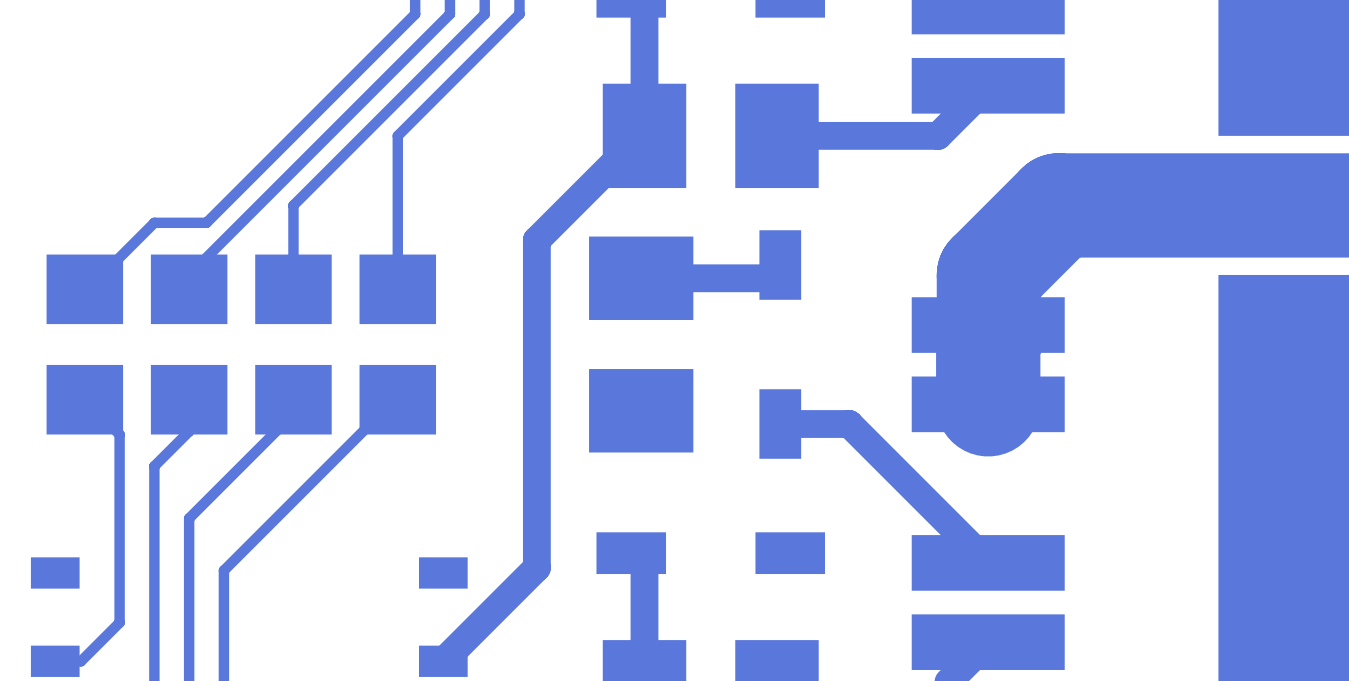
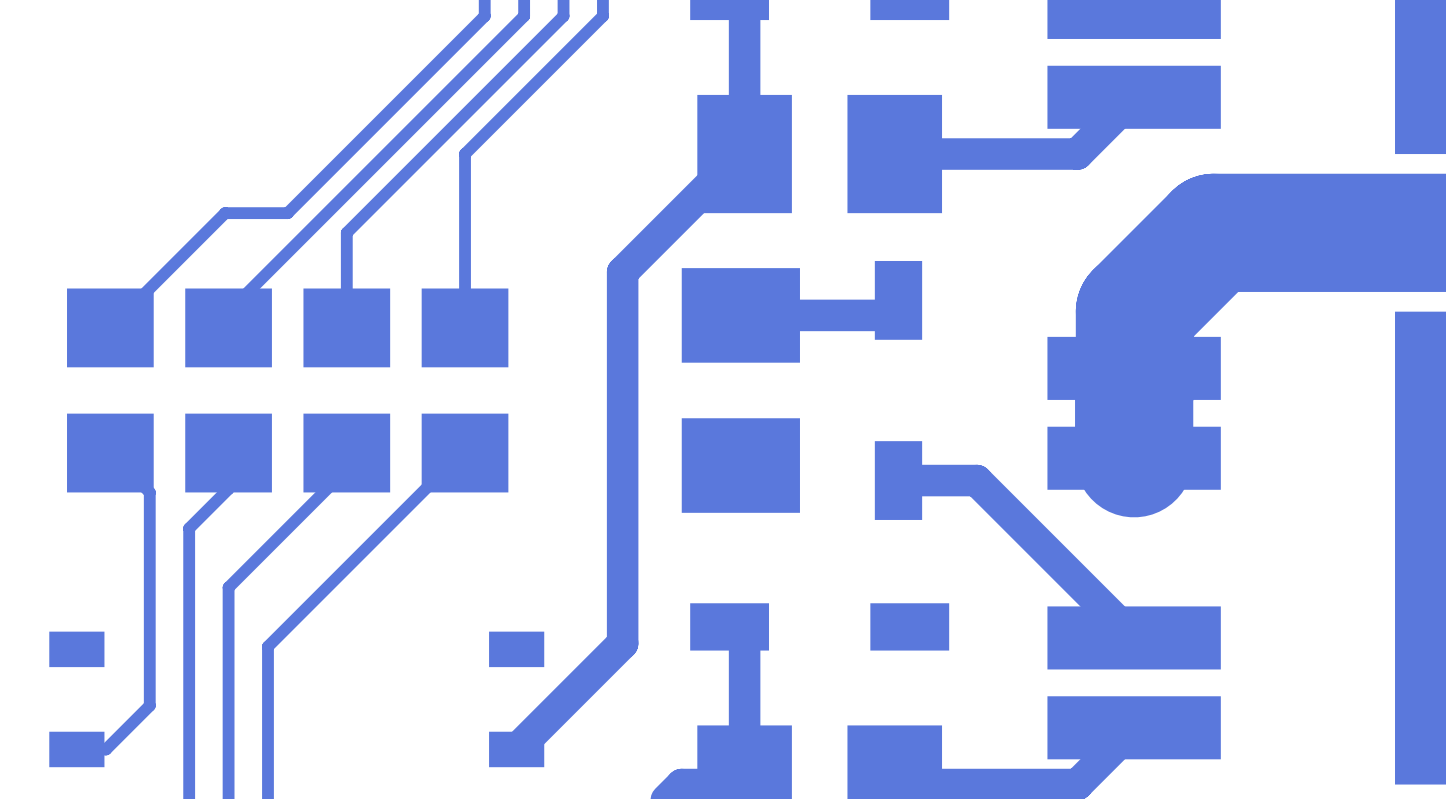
bottom track: (241, 188) (206, 222) (154, 222) (84, 292) -> (287, 213) (225, 213) (110, 327)

